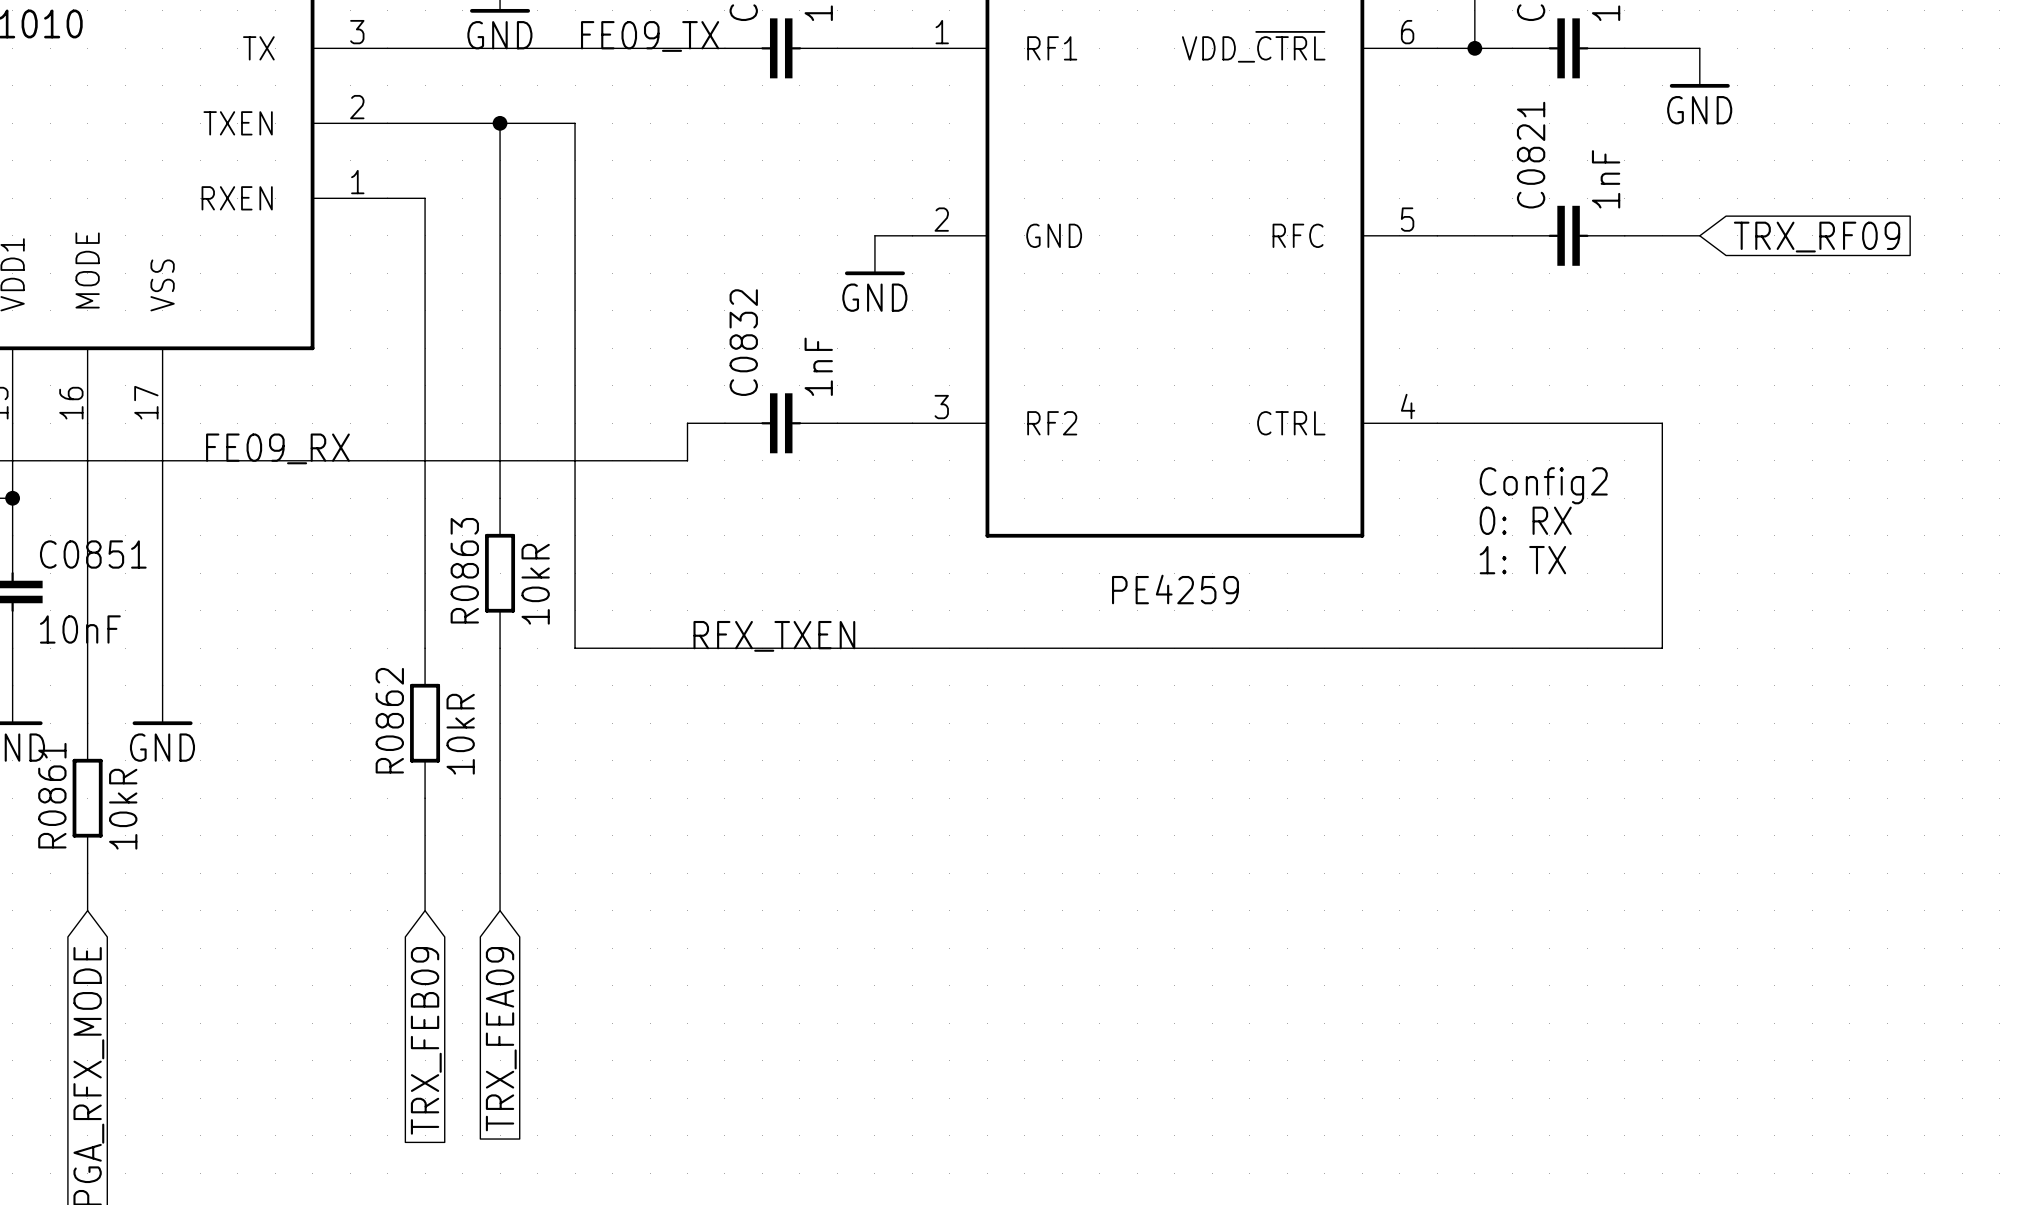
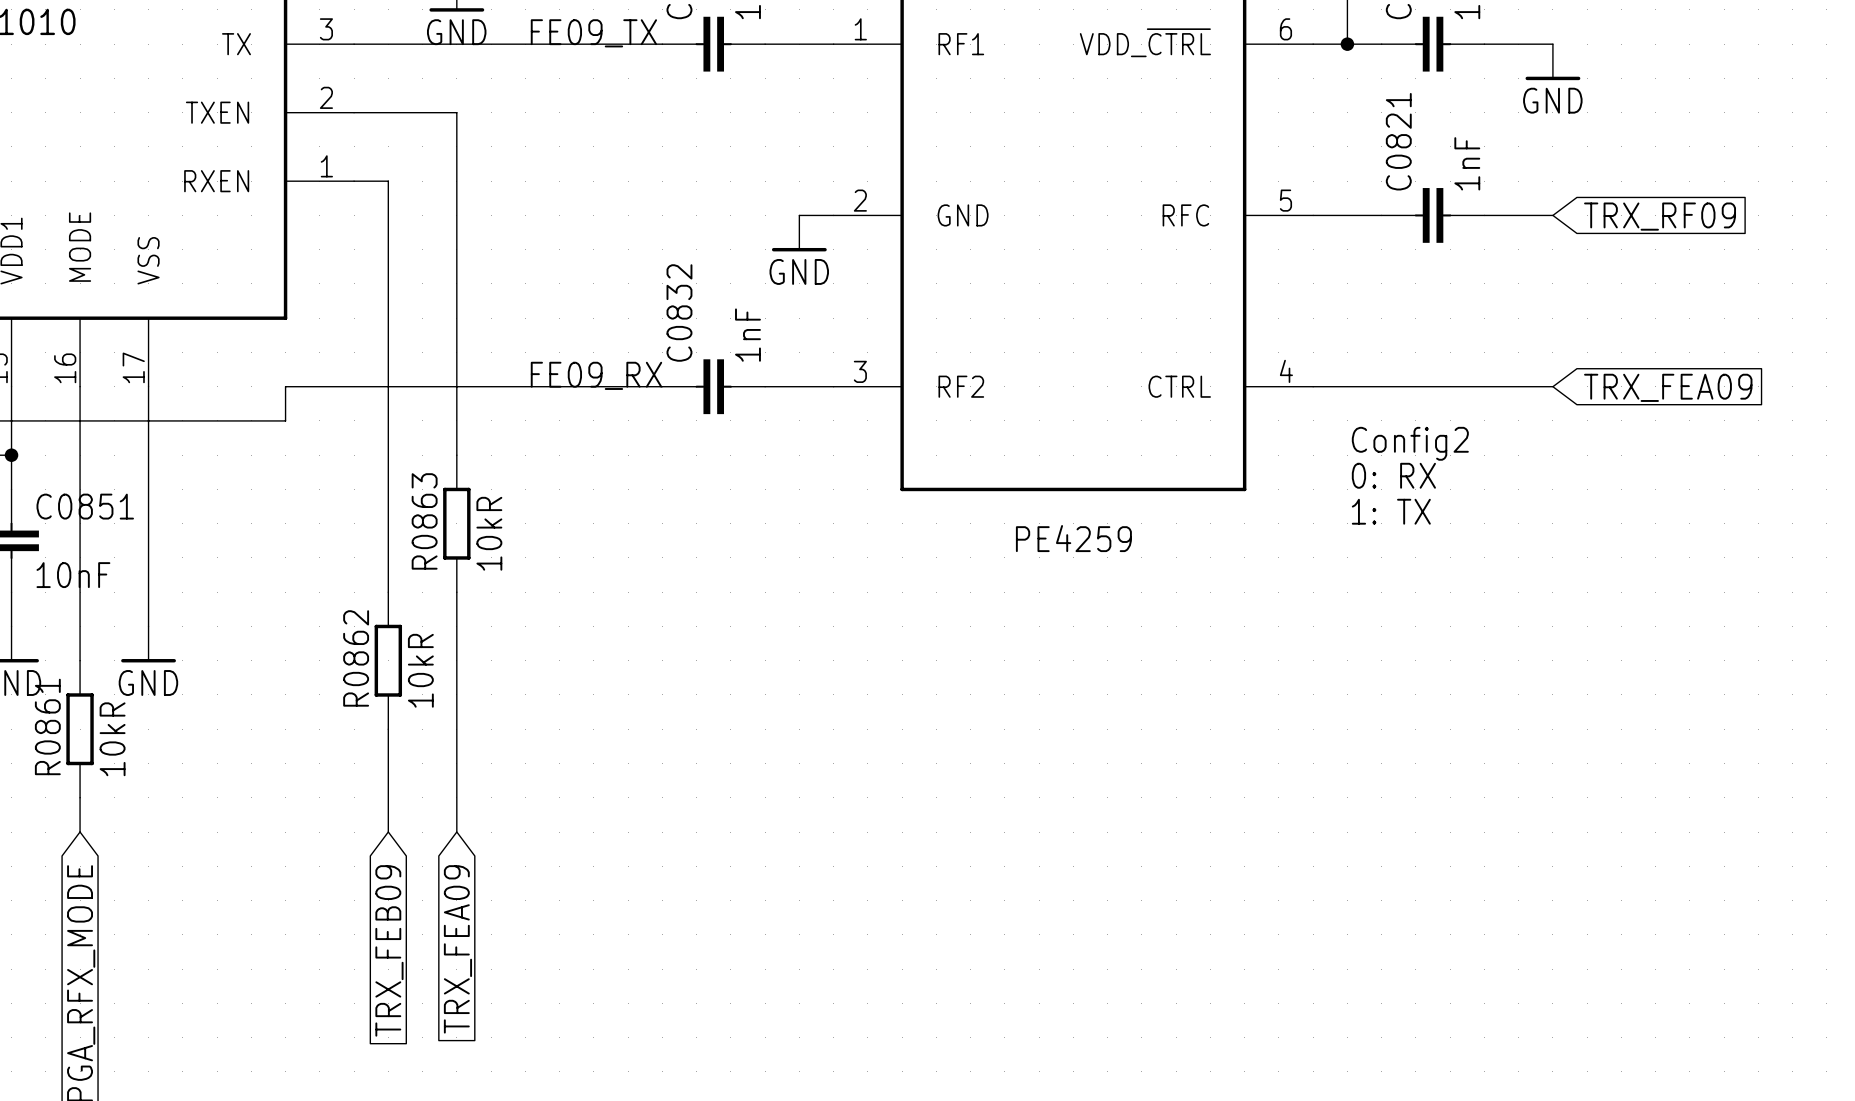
wire: (500, 123) (575, 123) (575, 648) (1662, 648) (1662, 423) -> (1552, 386) (1518, 386)
junction: (500, 123) -> none
label: none -> FE09_RX (596, 375)
wire: (687, 423) (687, 460) (312, 460) -> (628, 386) (285, 386) (285, 420)
global label: none -> TRX_FEA09 (1668, 387)
label: FE09_RX (277, 448) -> none
label: RFX_TXEN (774, 636) -> none

